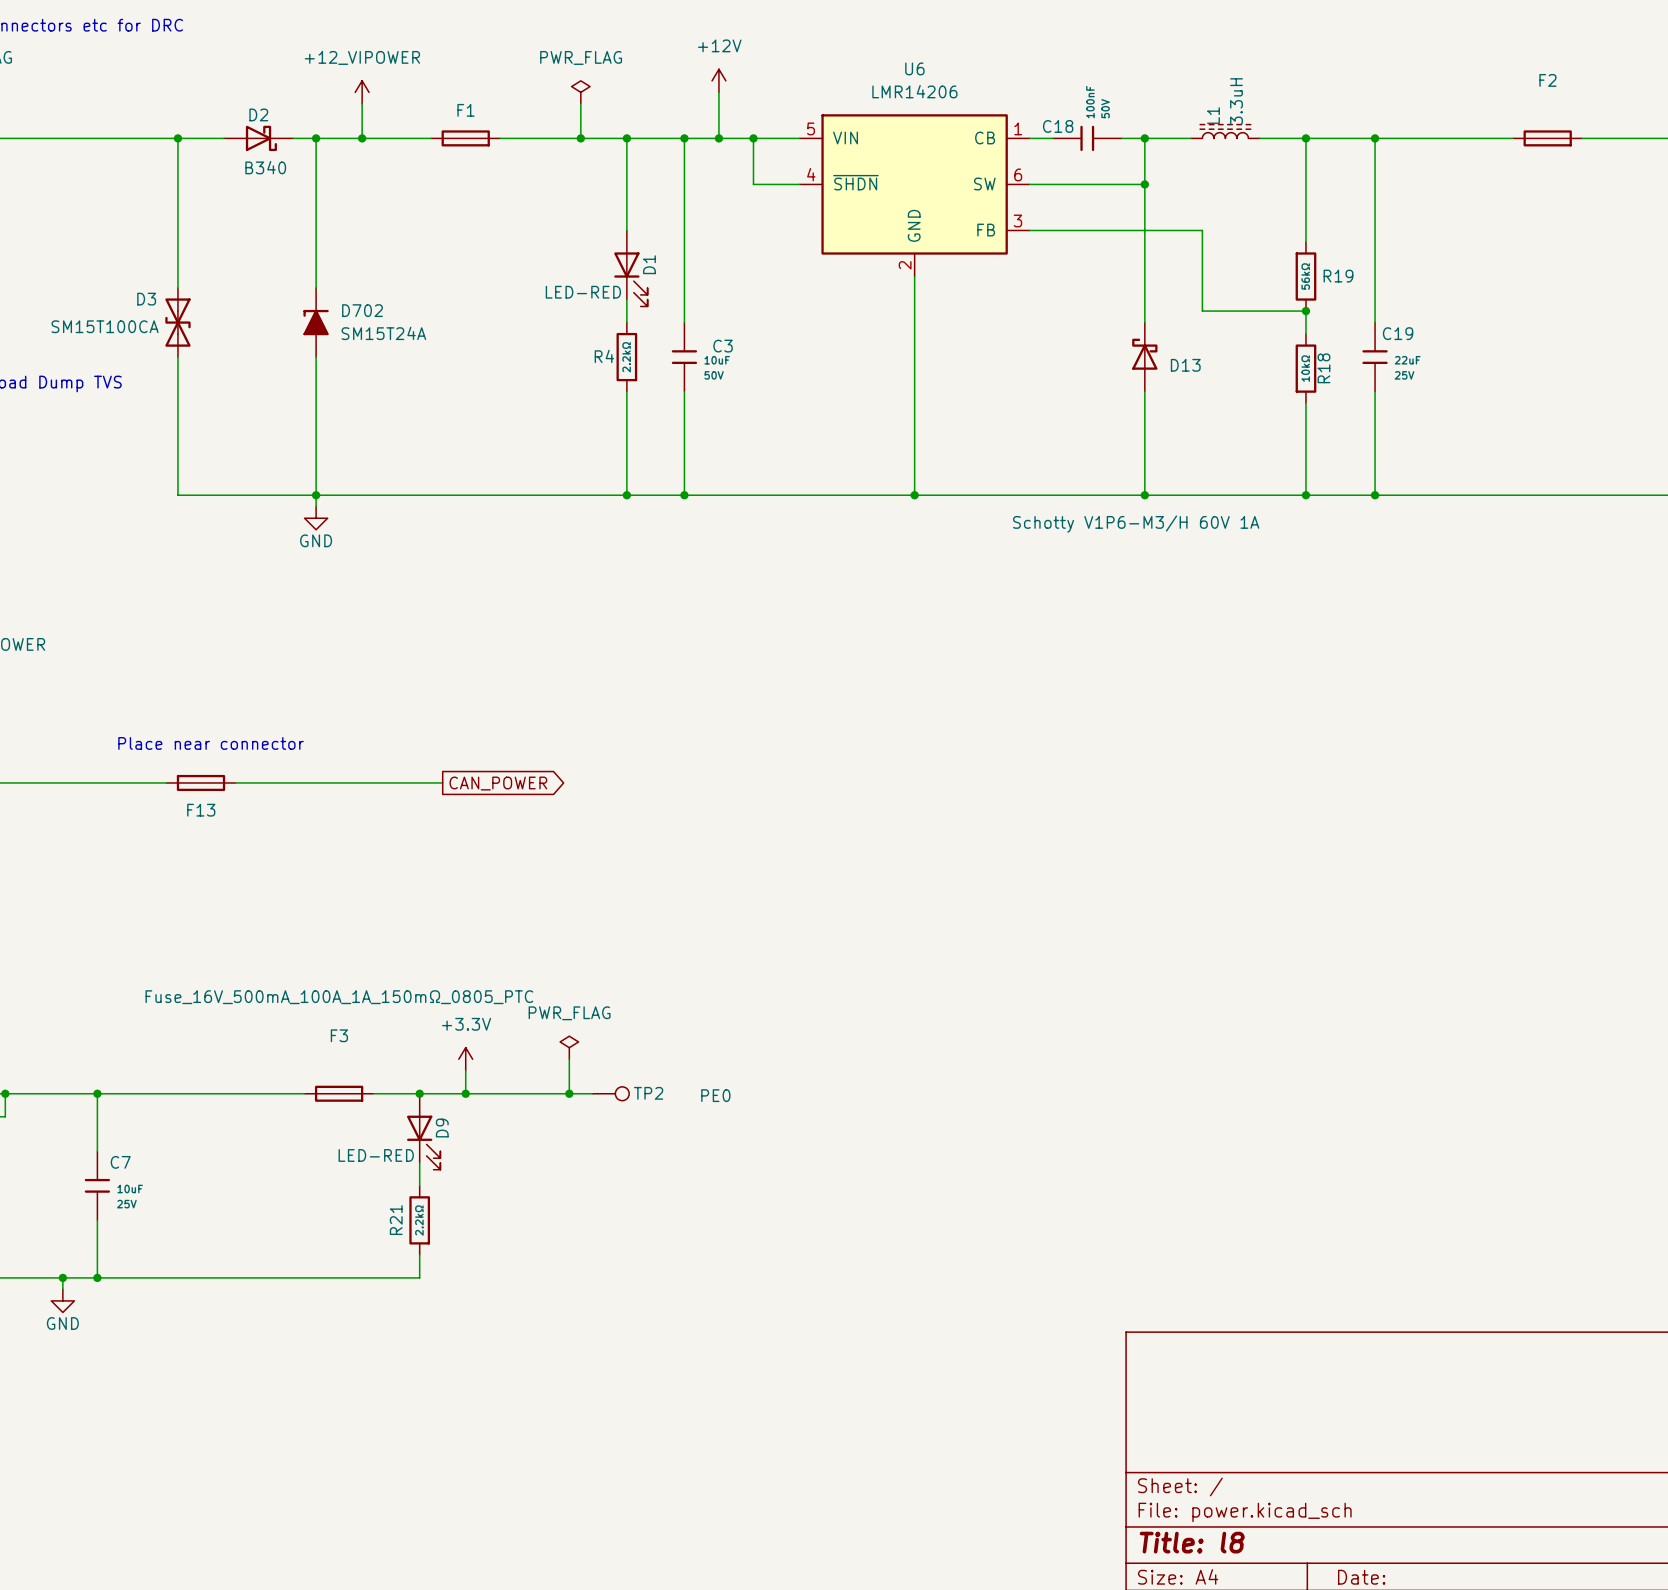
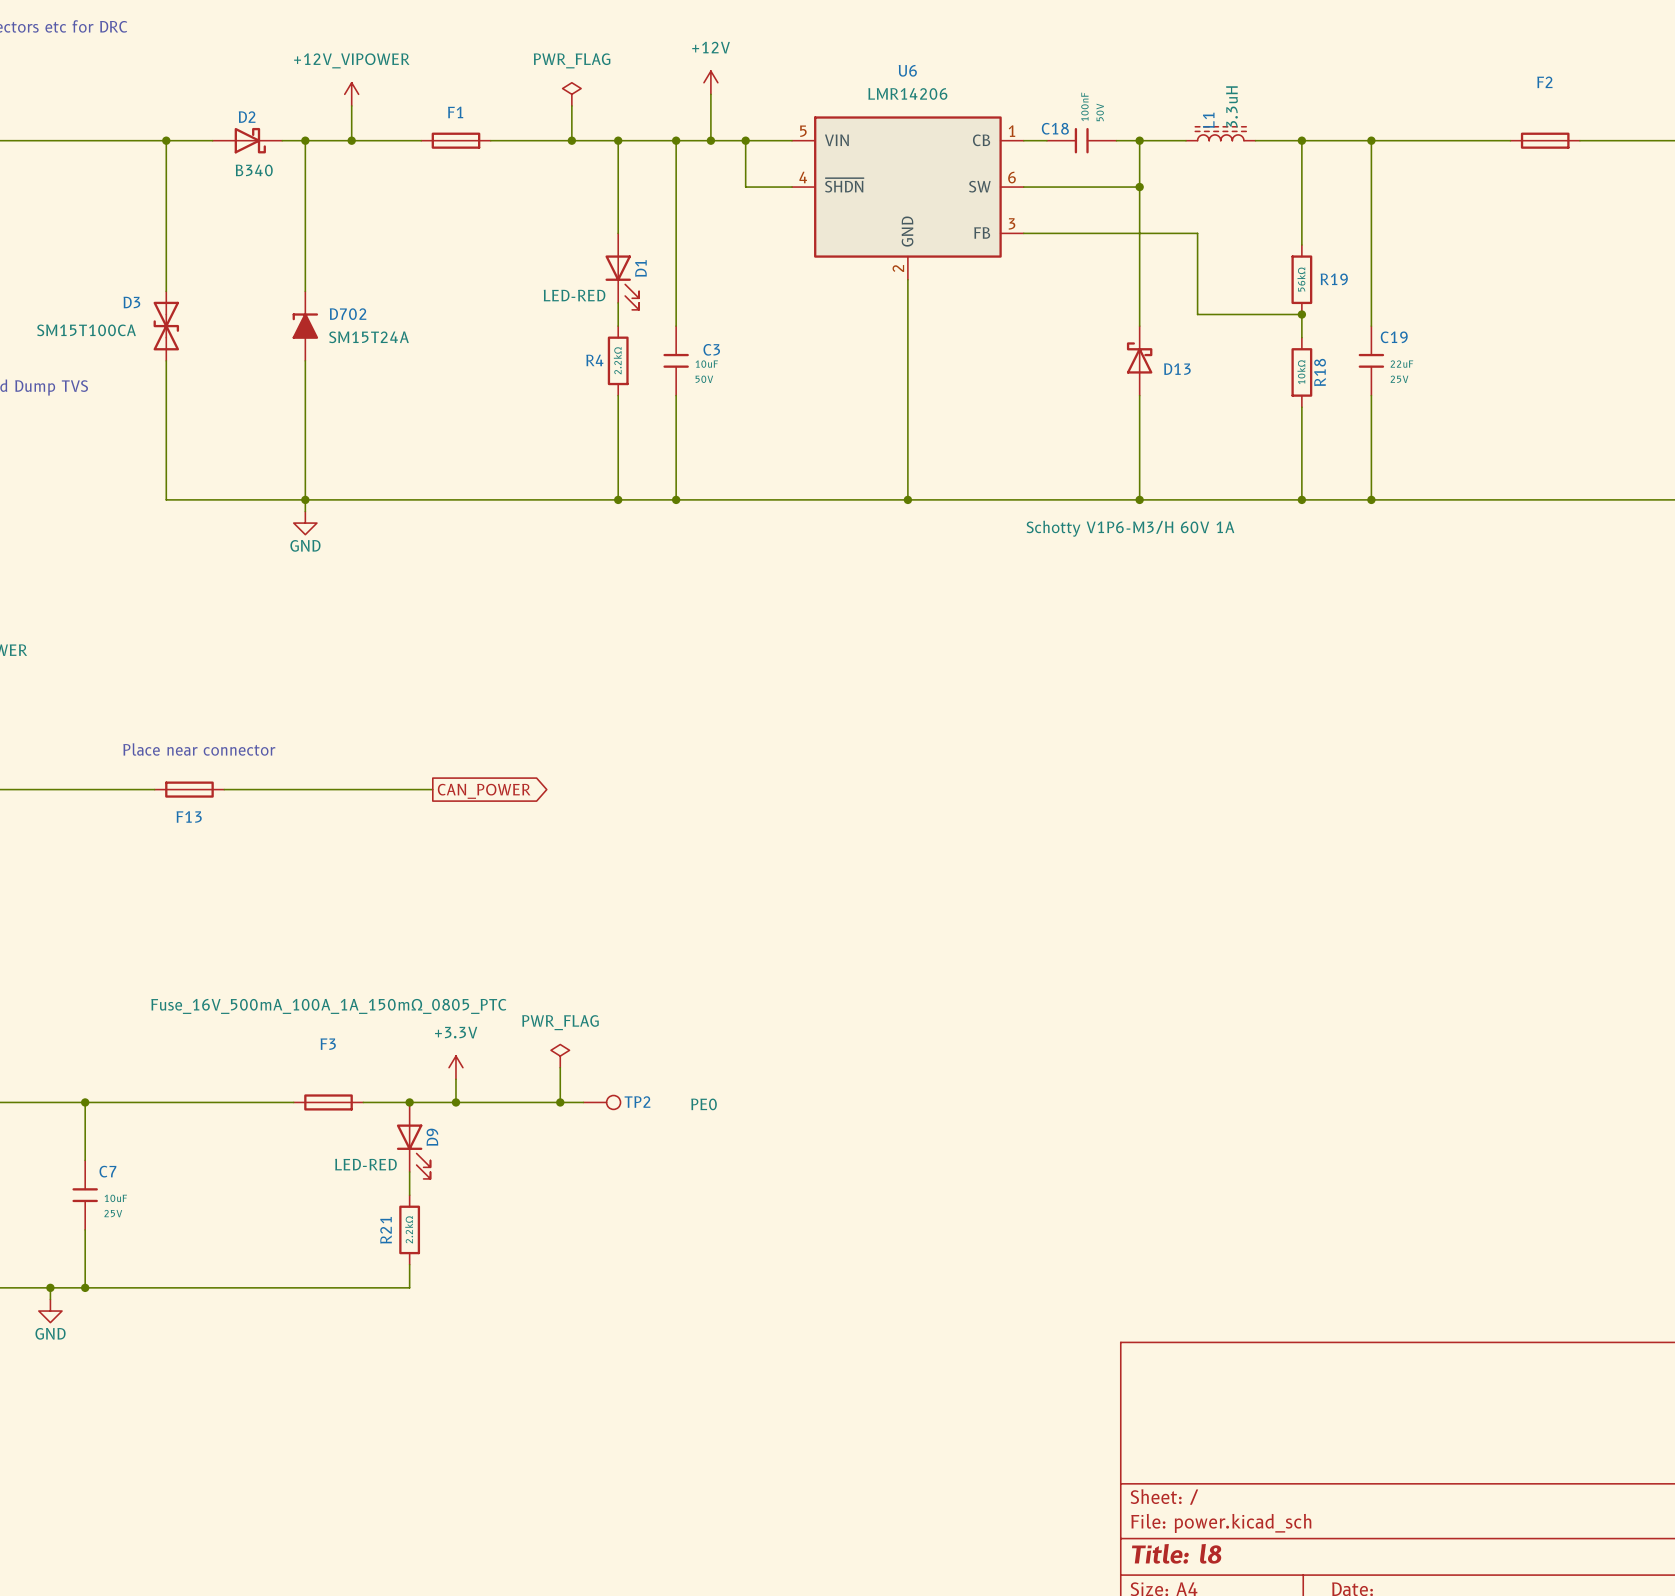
power symbol: +12_VIPOWER (362, 92) -> +12V_VIPOWER (351, 94)

